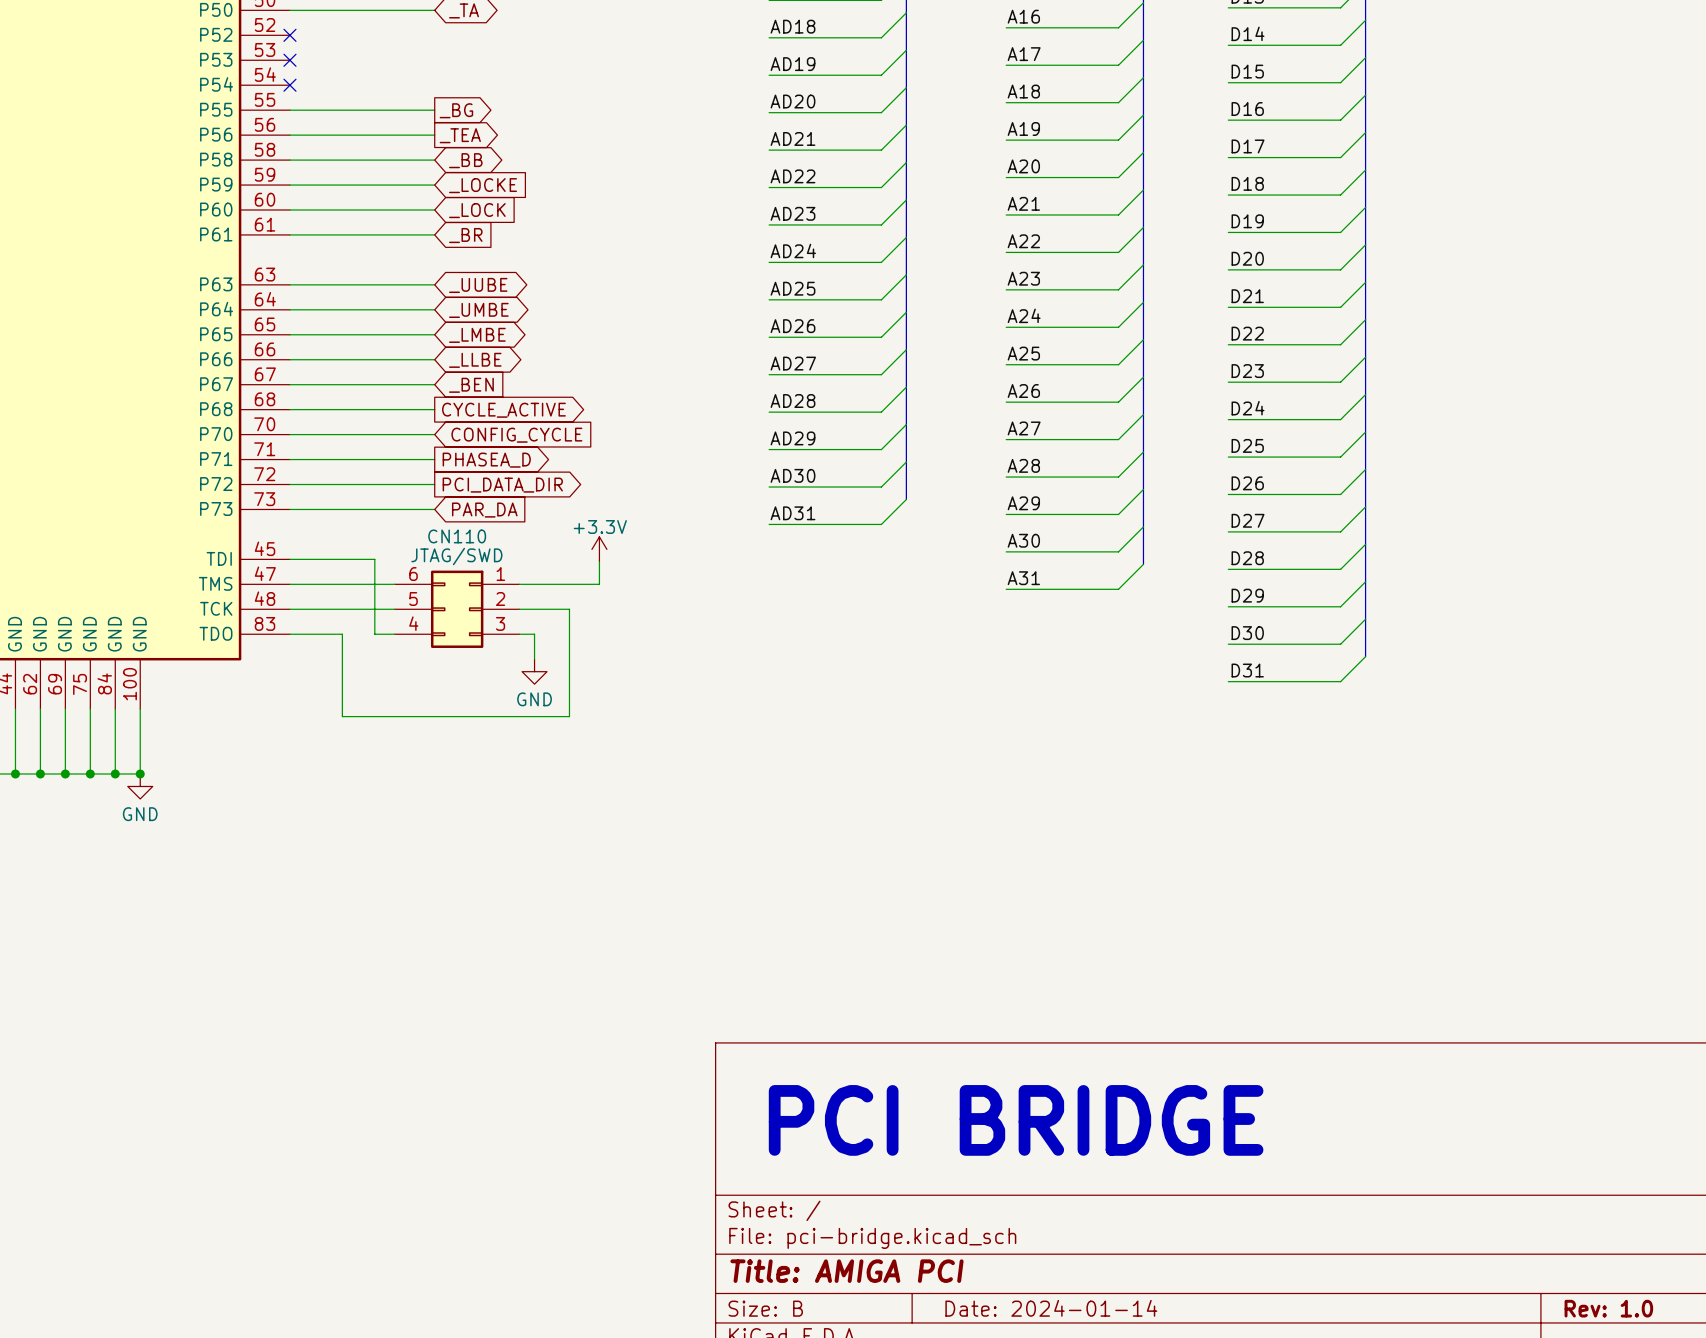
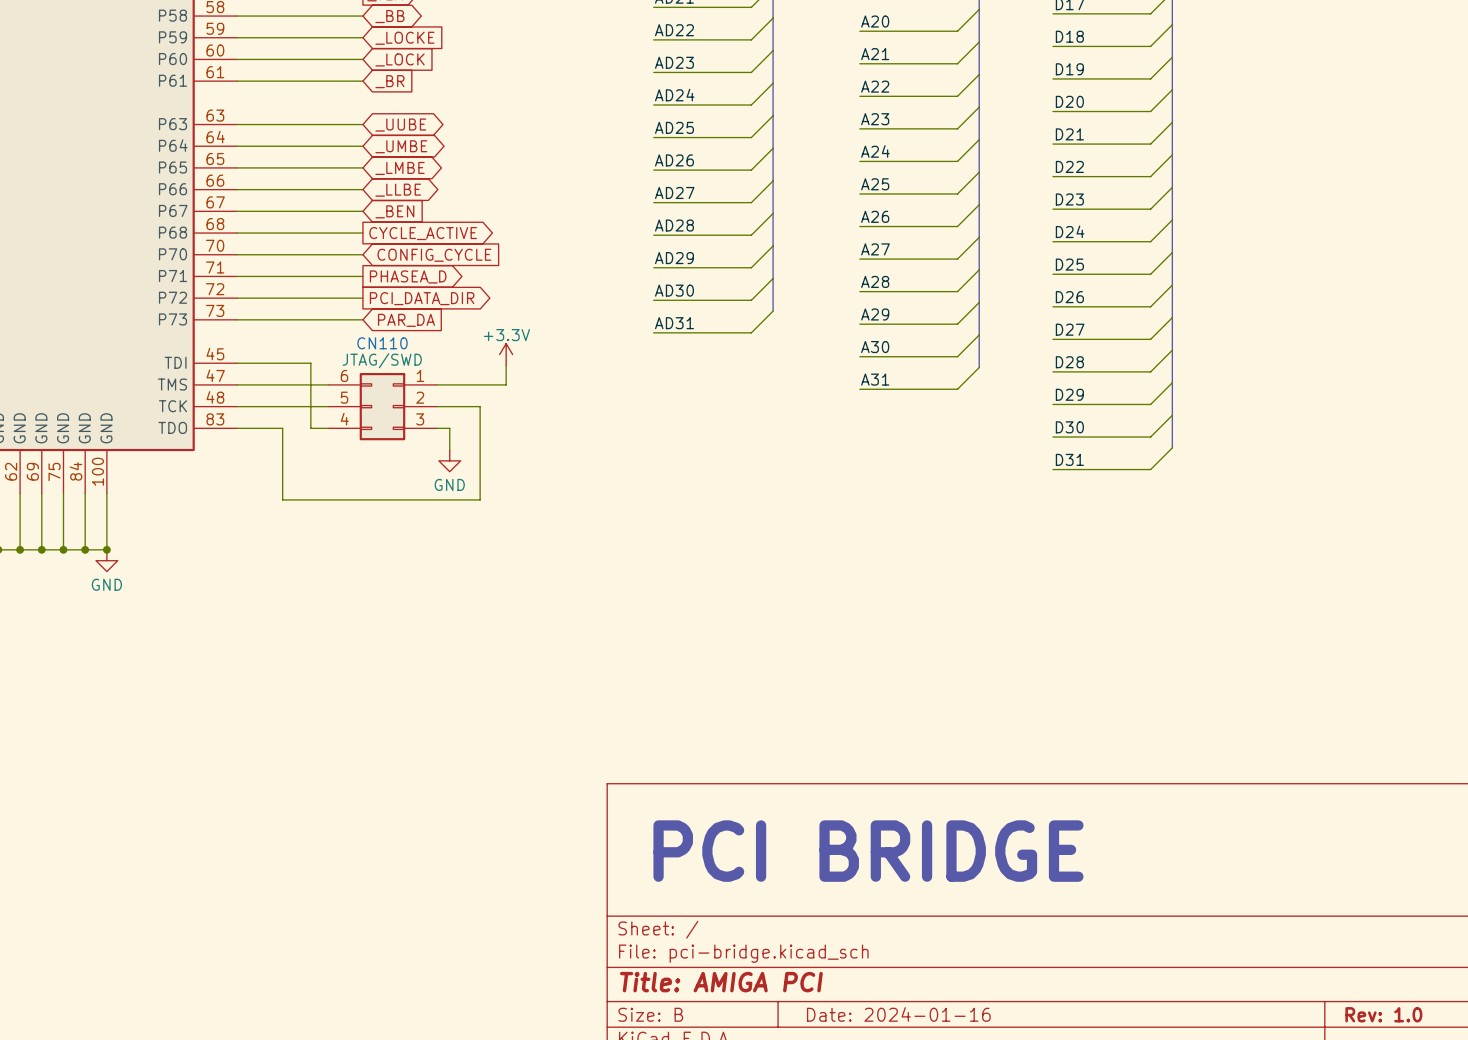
title block: Date: 2024-01-14 (1051, 1308) -> Date: 2024-01-16 (898, 1014)

